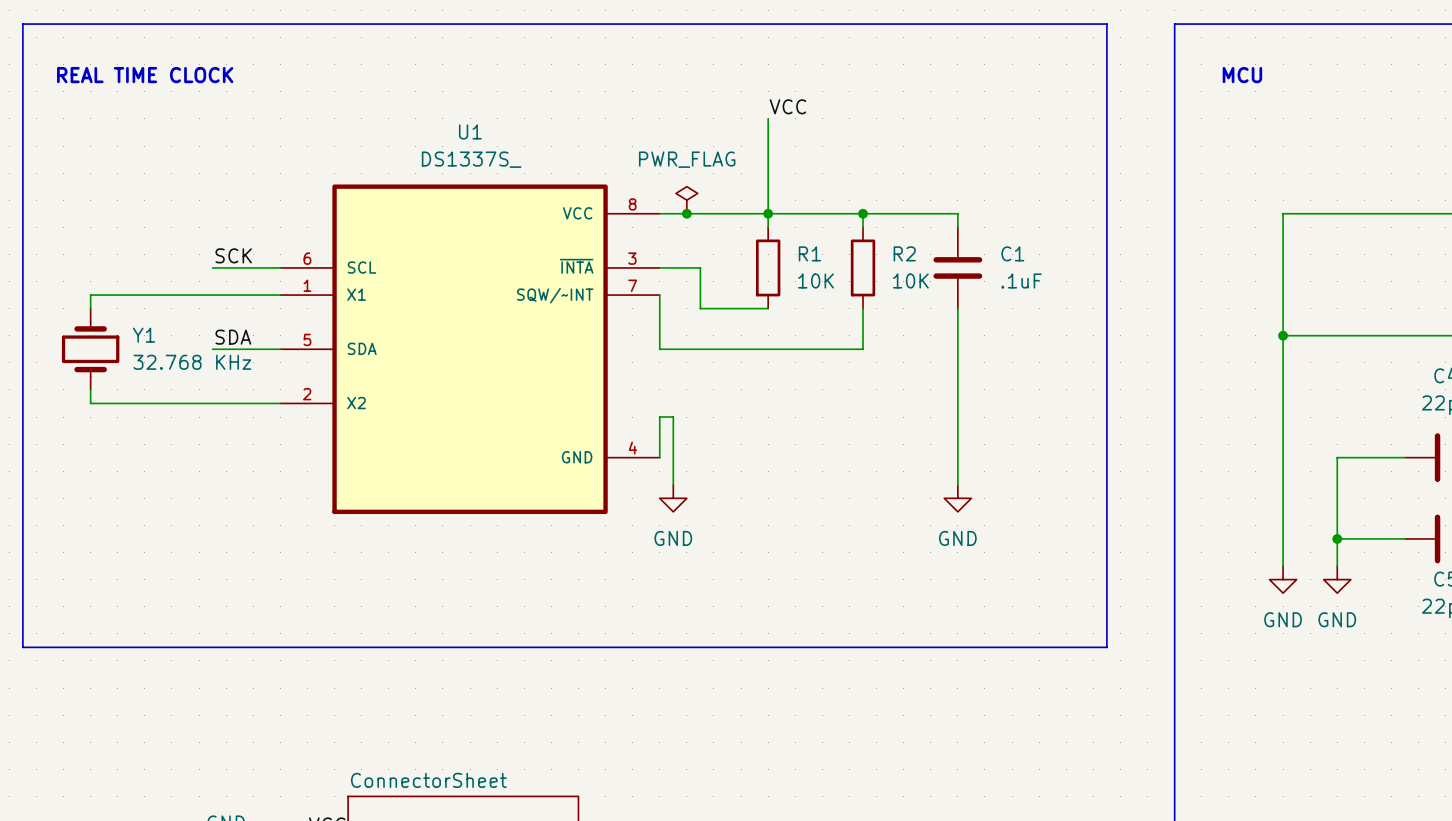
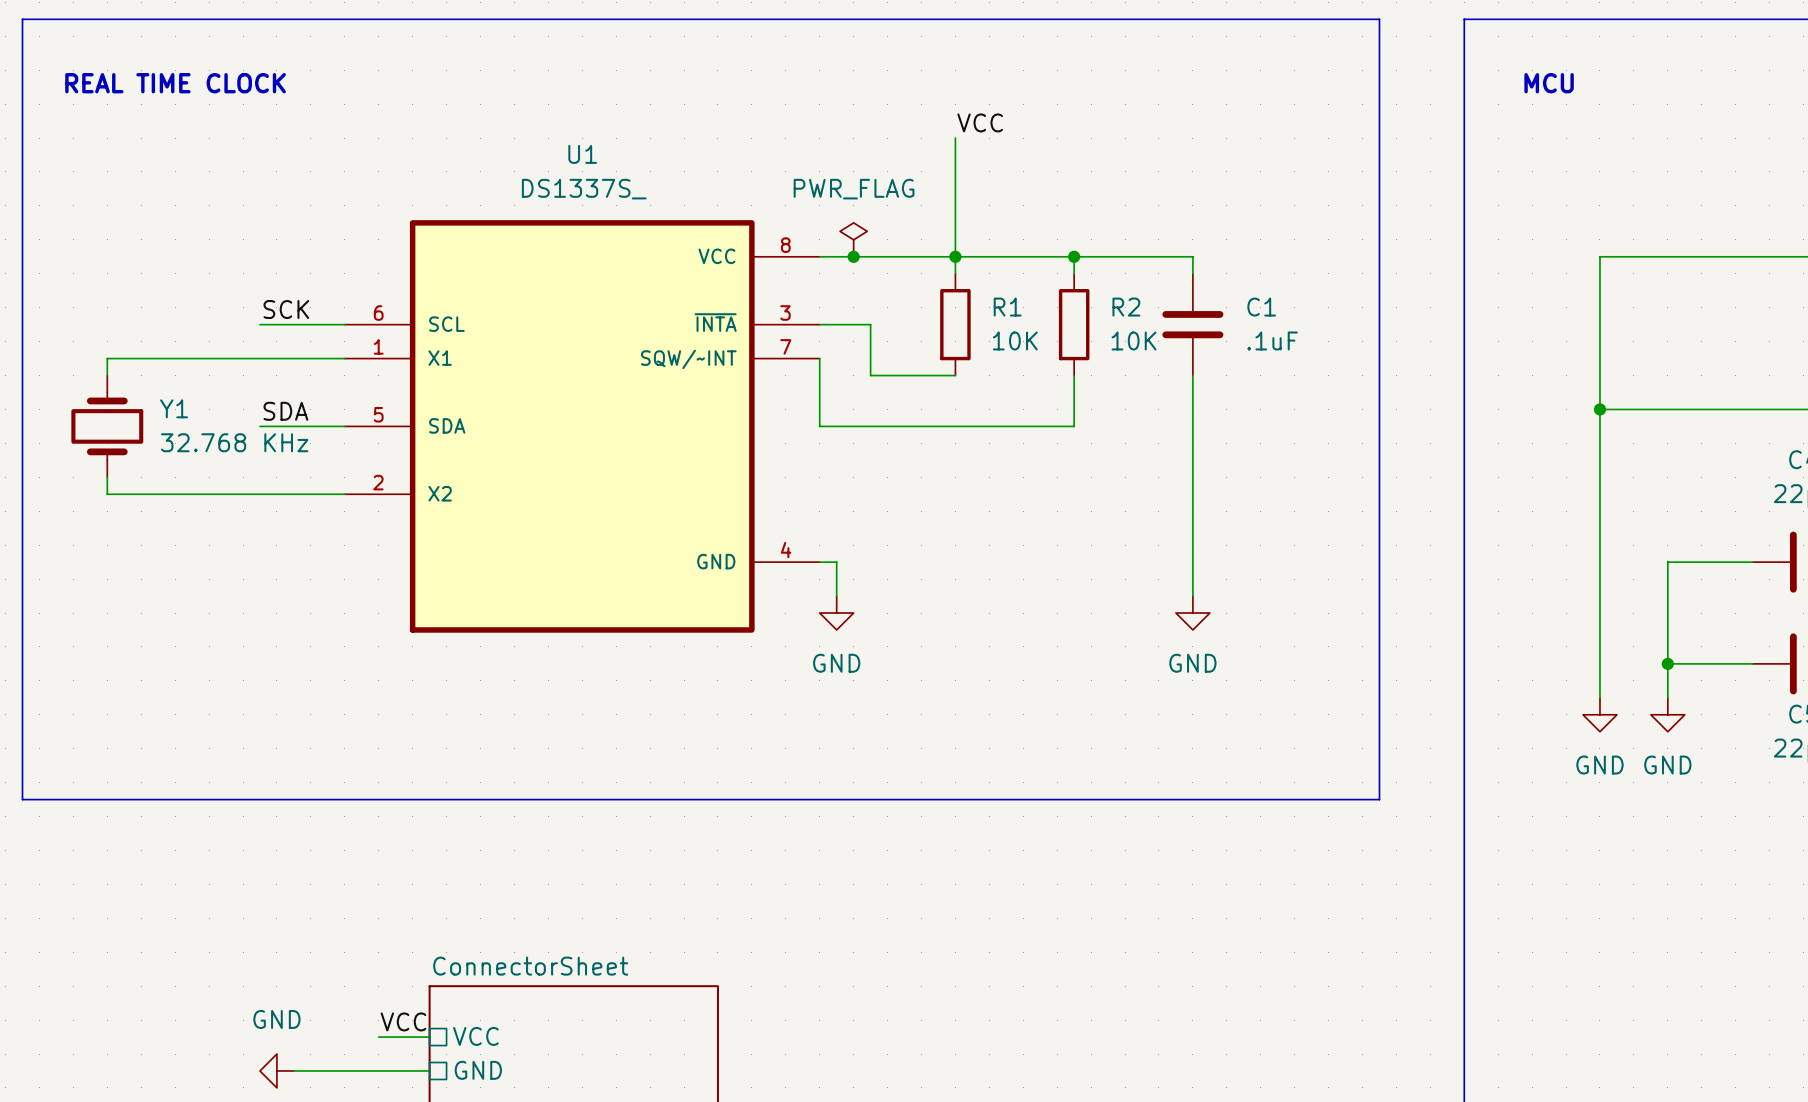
wire: (659, 457) (659, 417) (673, 417) (673, 457) -> (819, 562) (836, 562)

